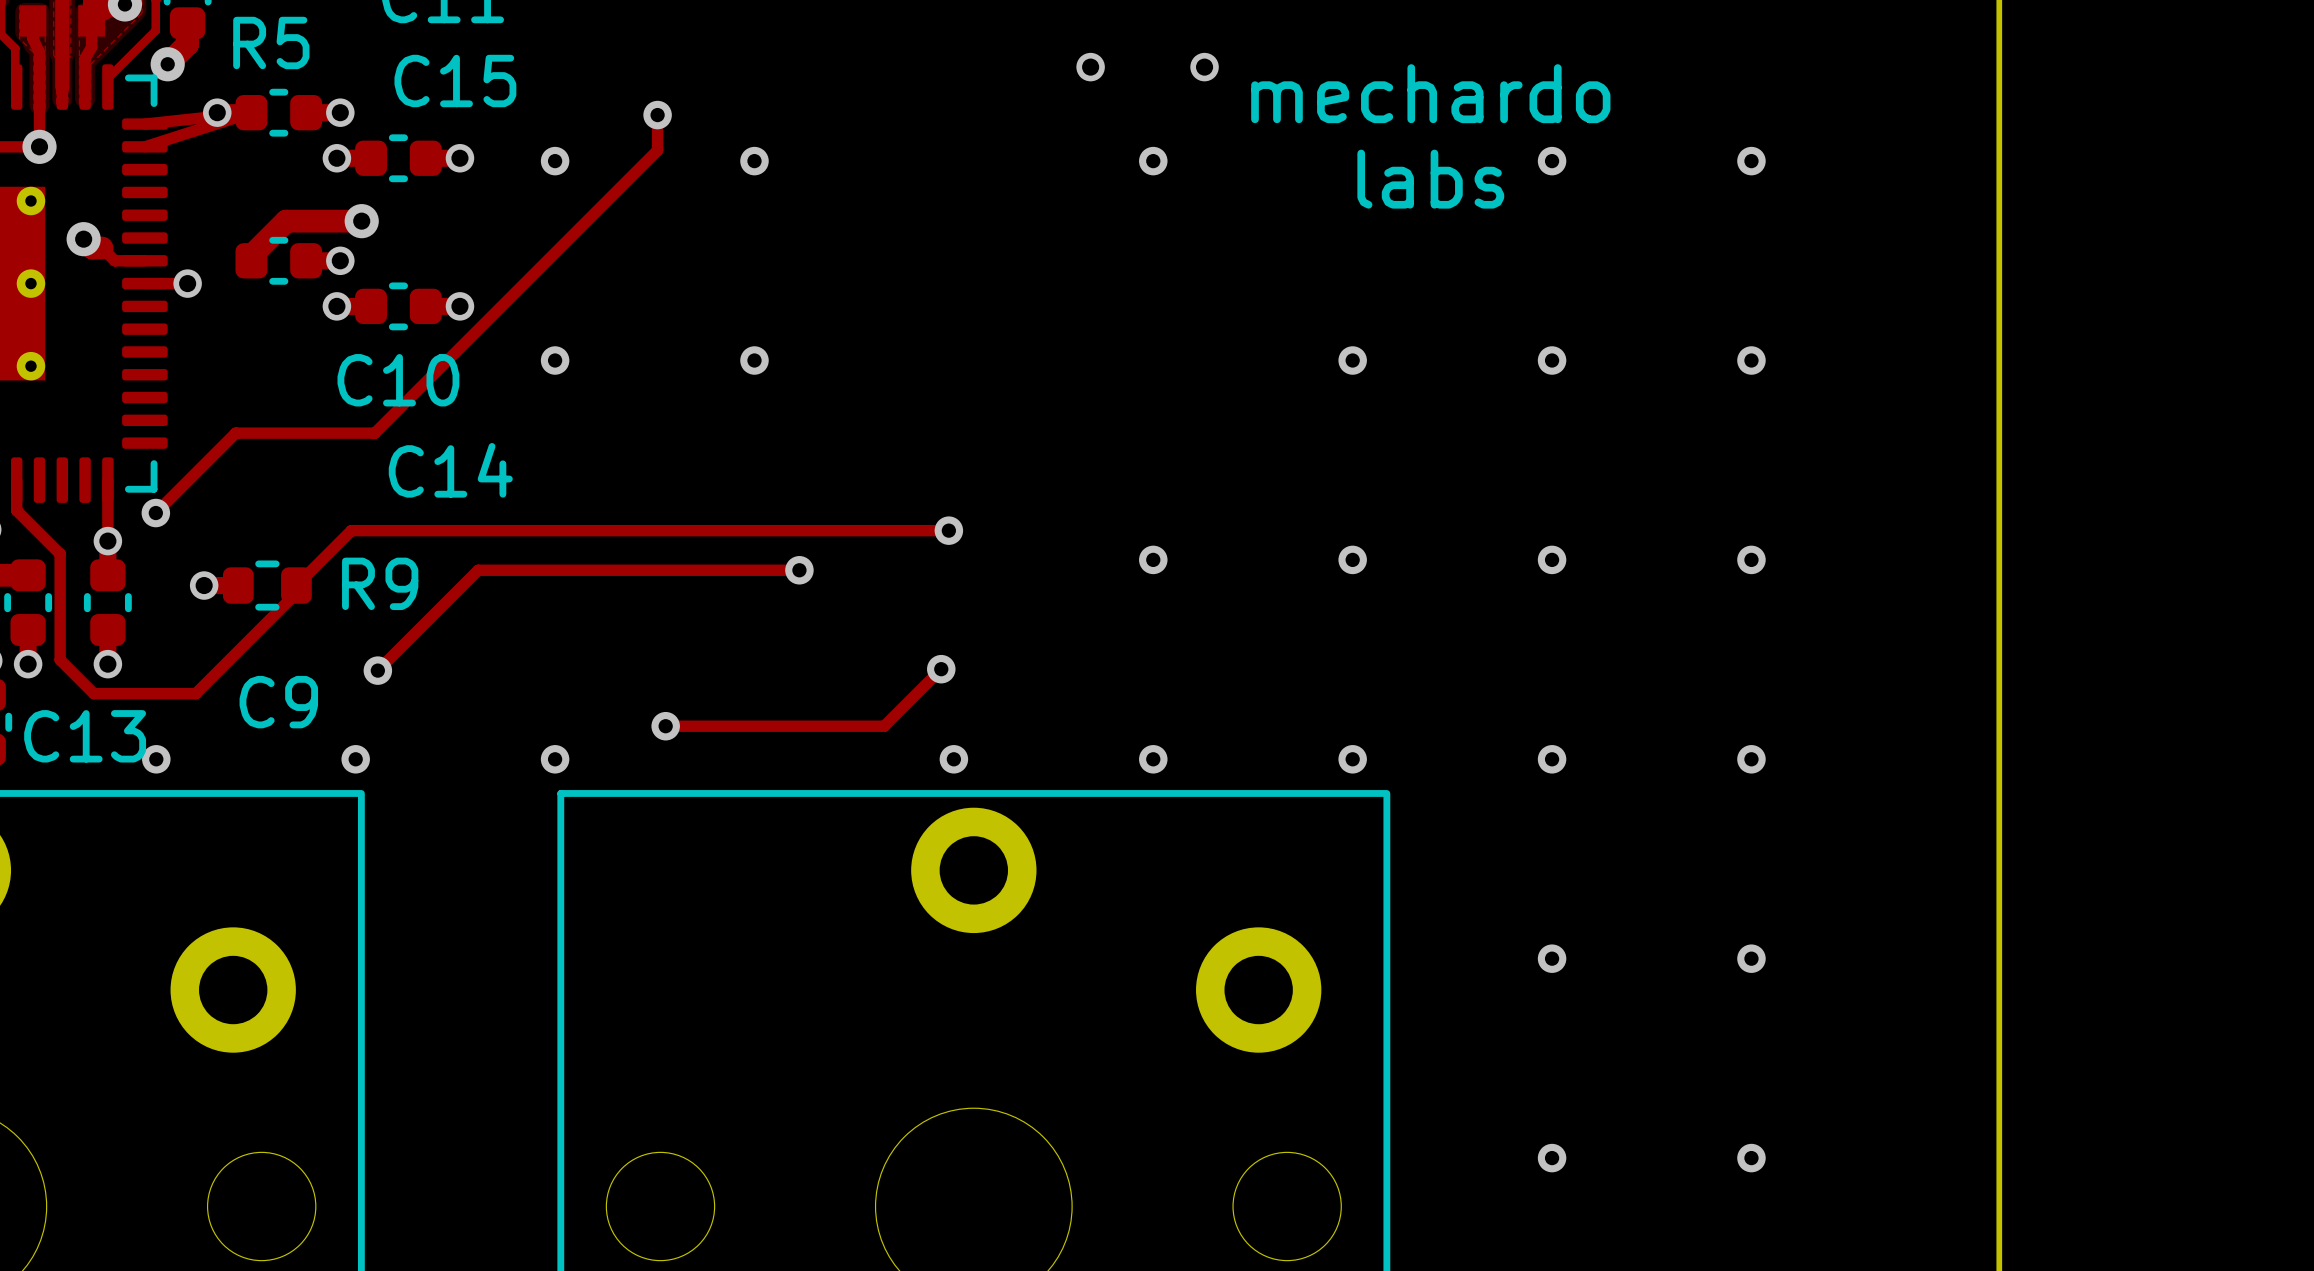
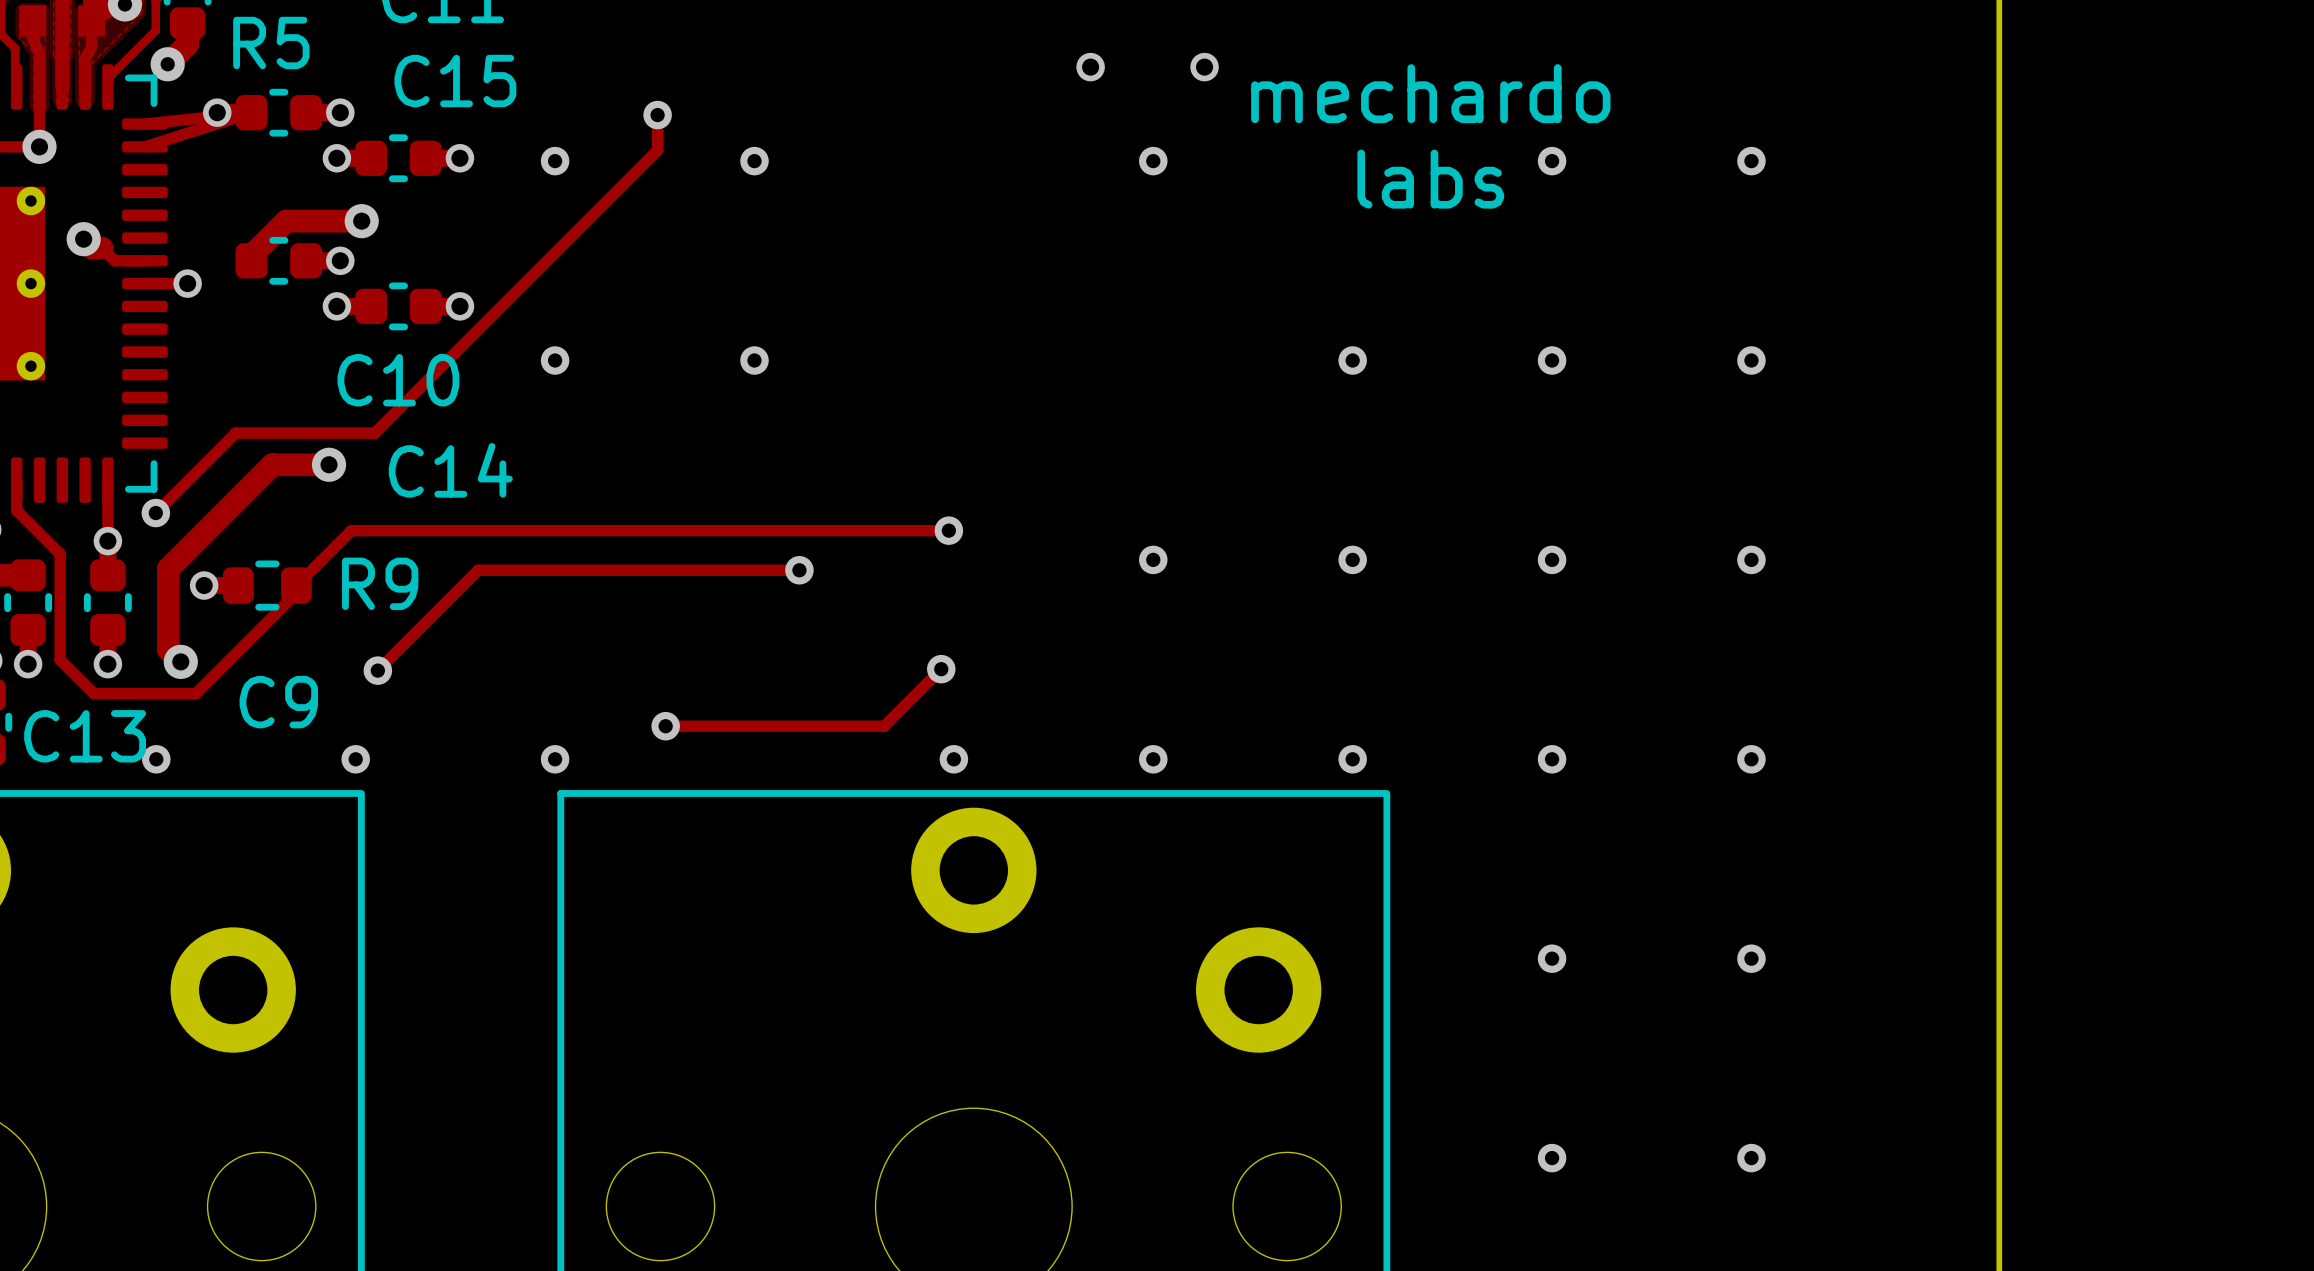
track: none -> (329, 464) (272, 464) (168, 568) (168, 649) (180, 661)
via: none -> (329, 464)
via: none -> (180, 661)

